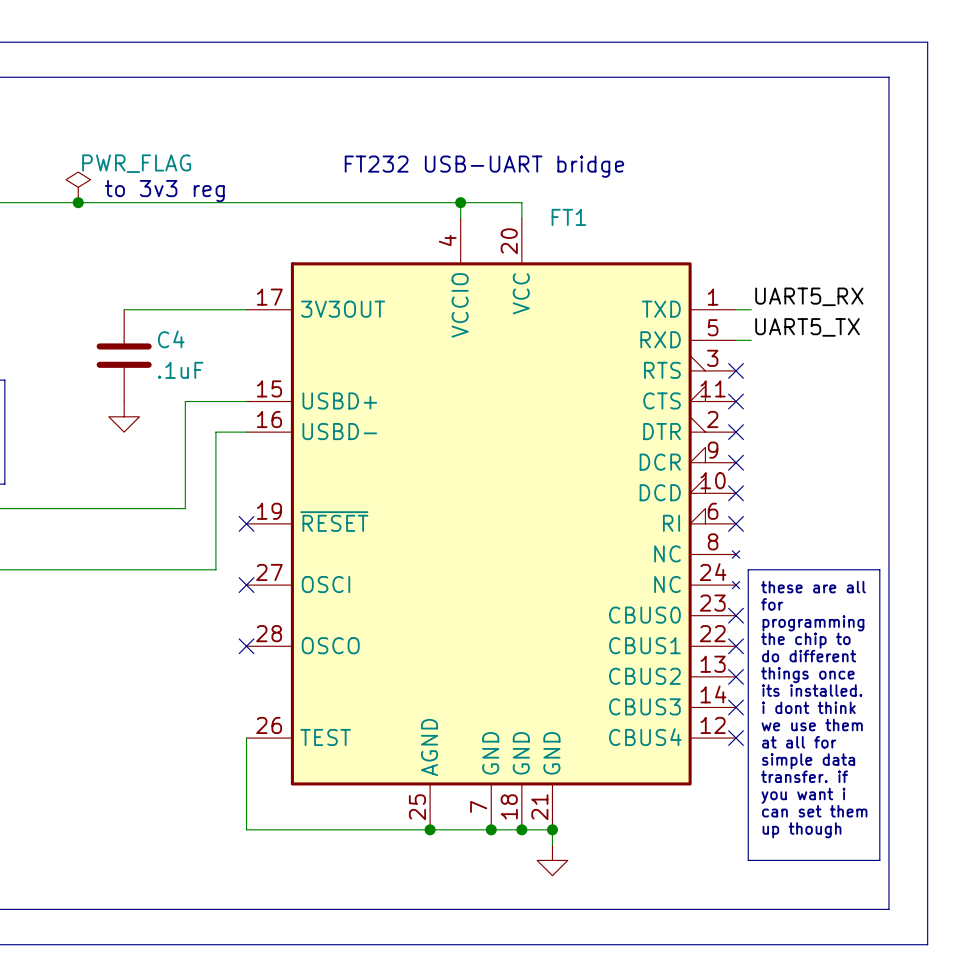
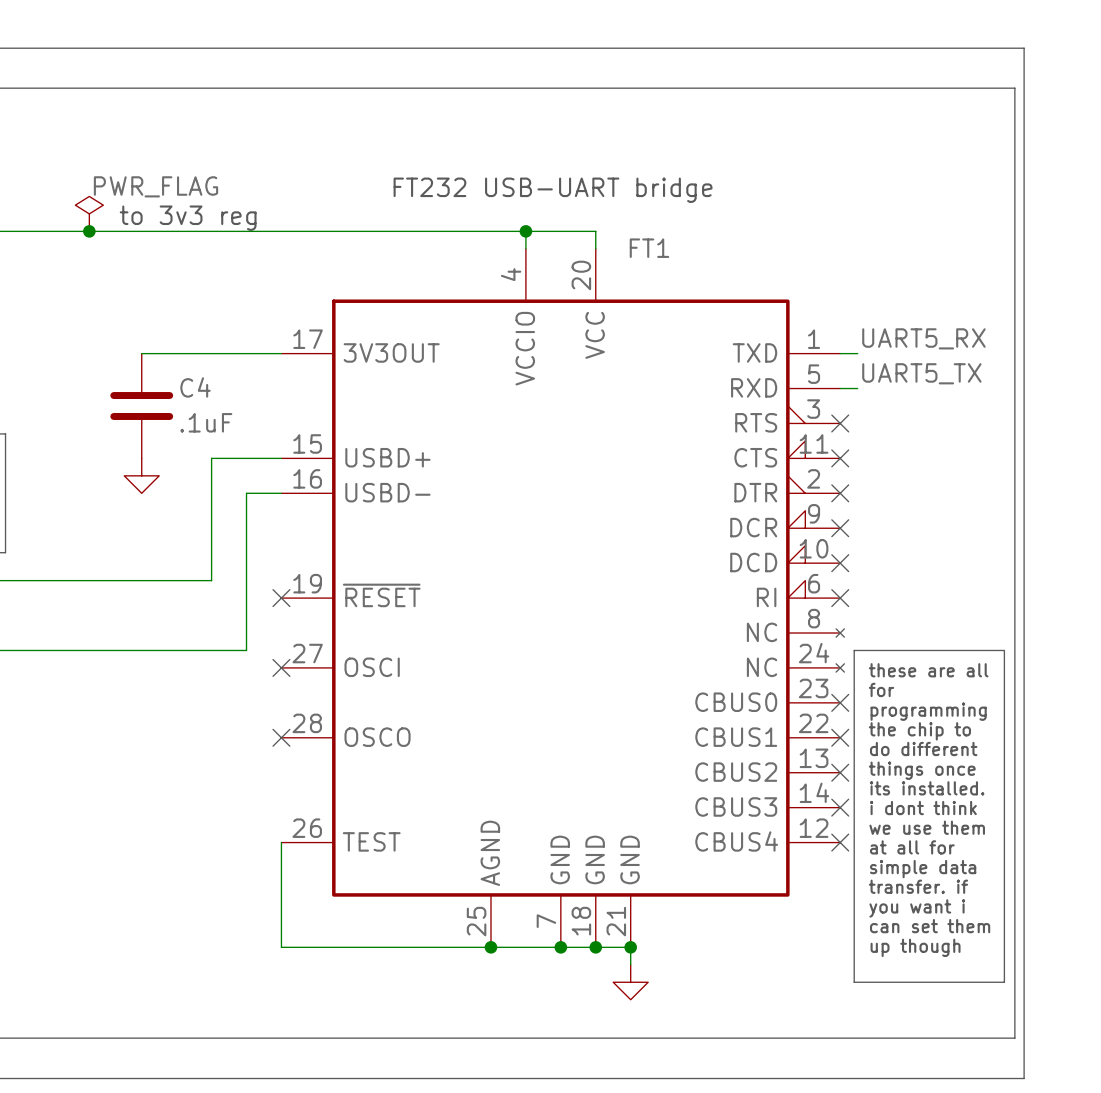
line: (897, 42) (927, 42) (927, 944) (897, 944) -> (1024, 48) (1024, 1078)

